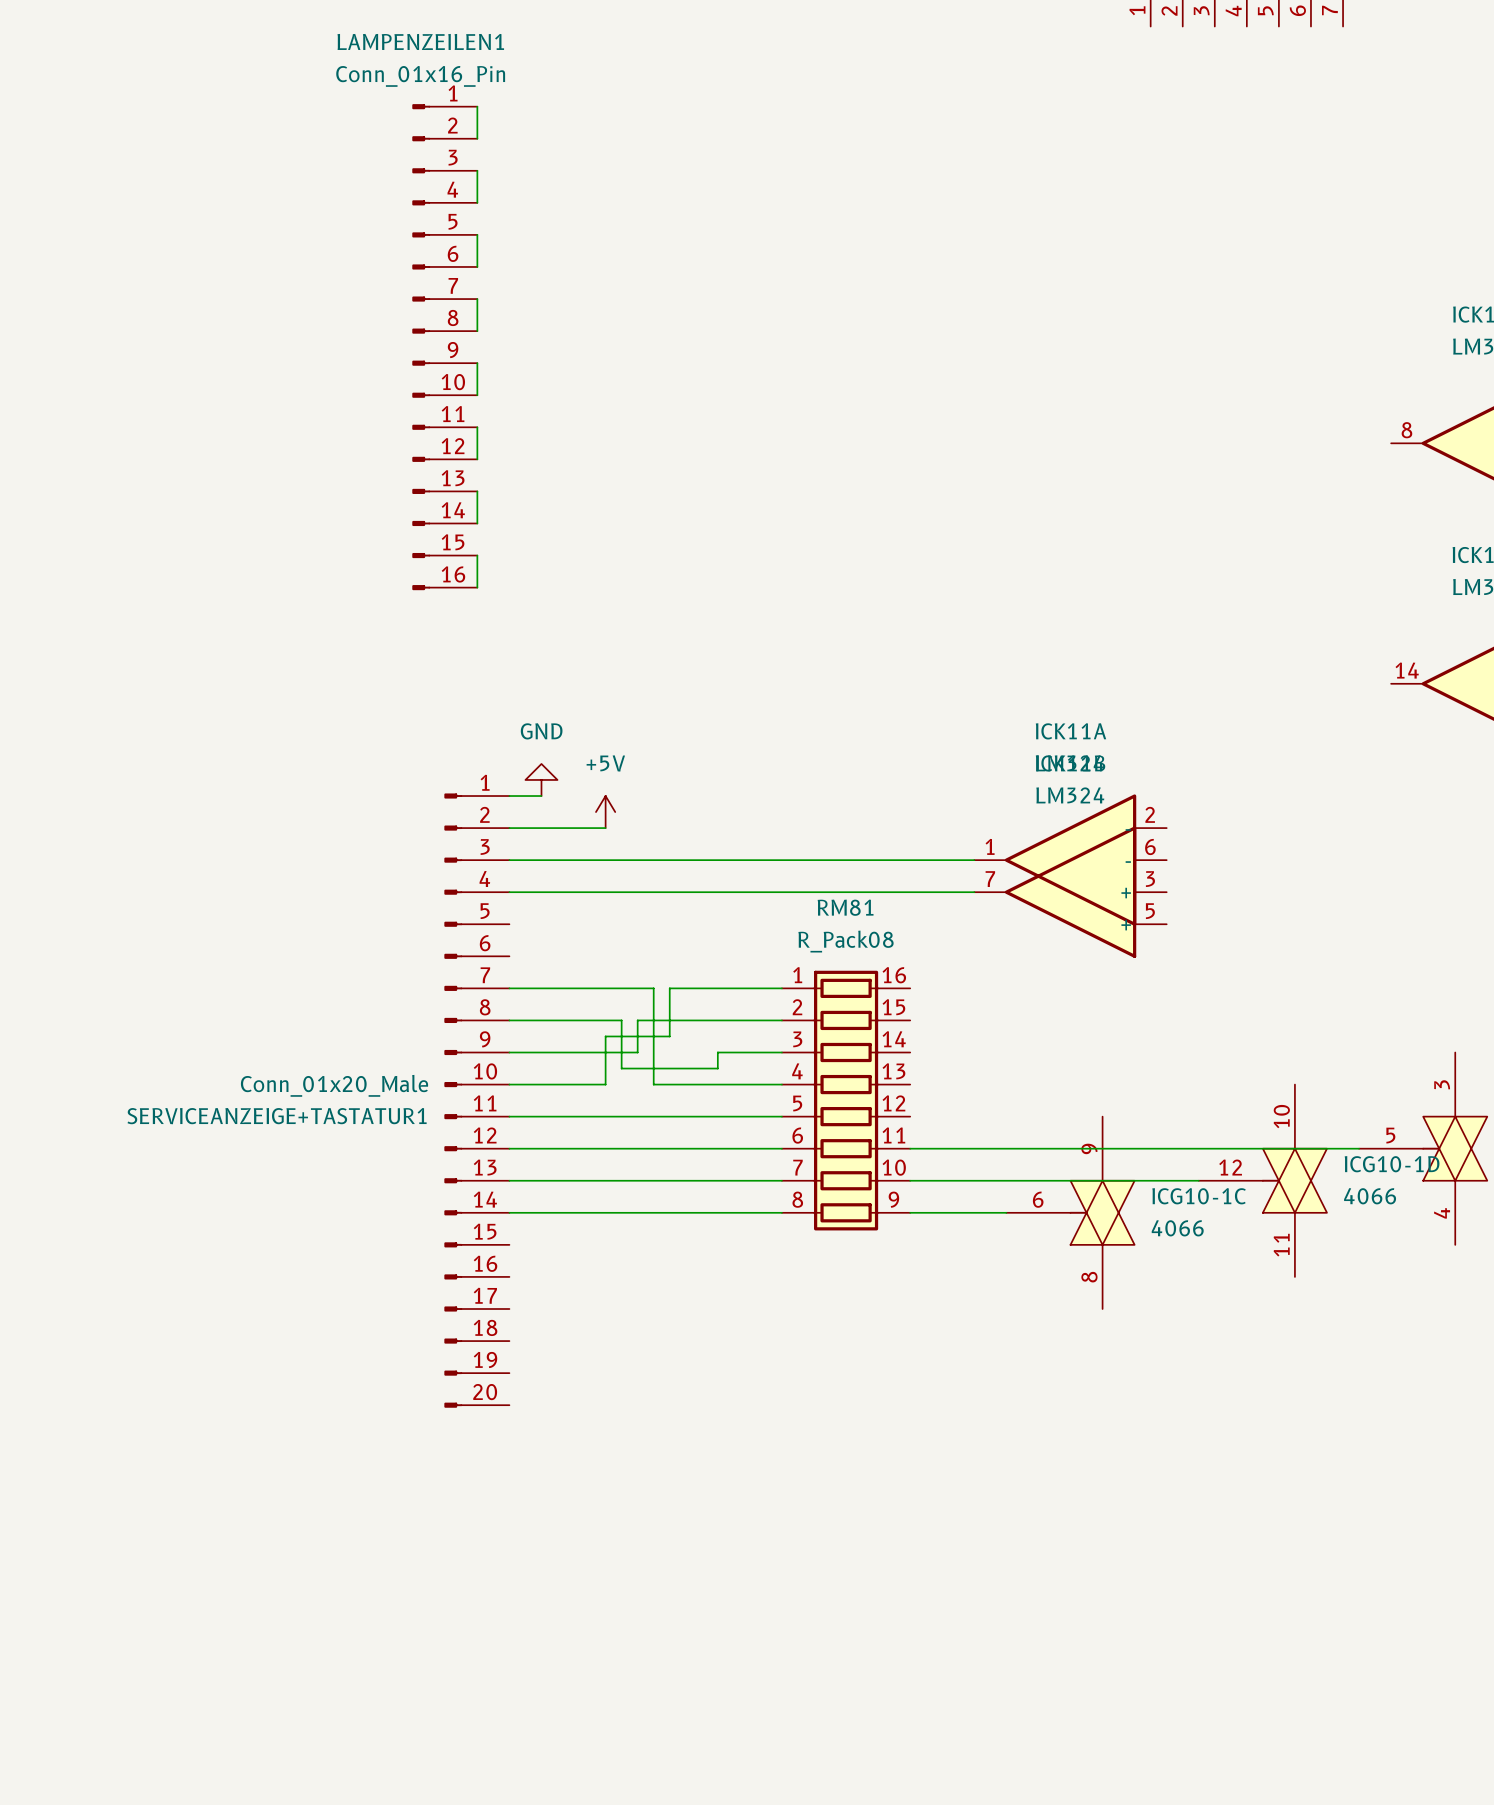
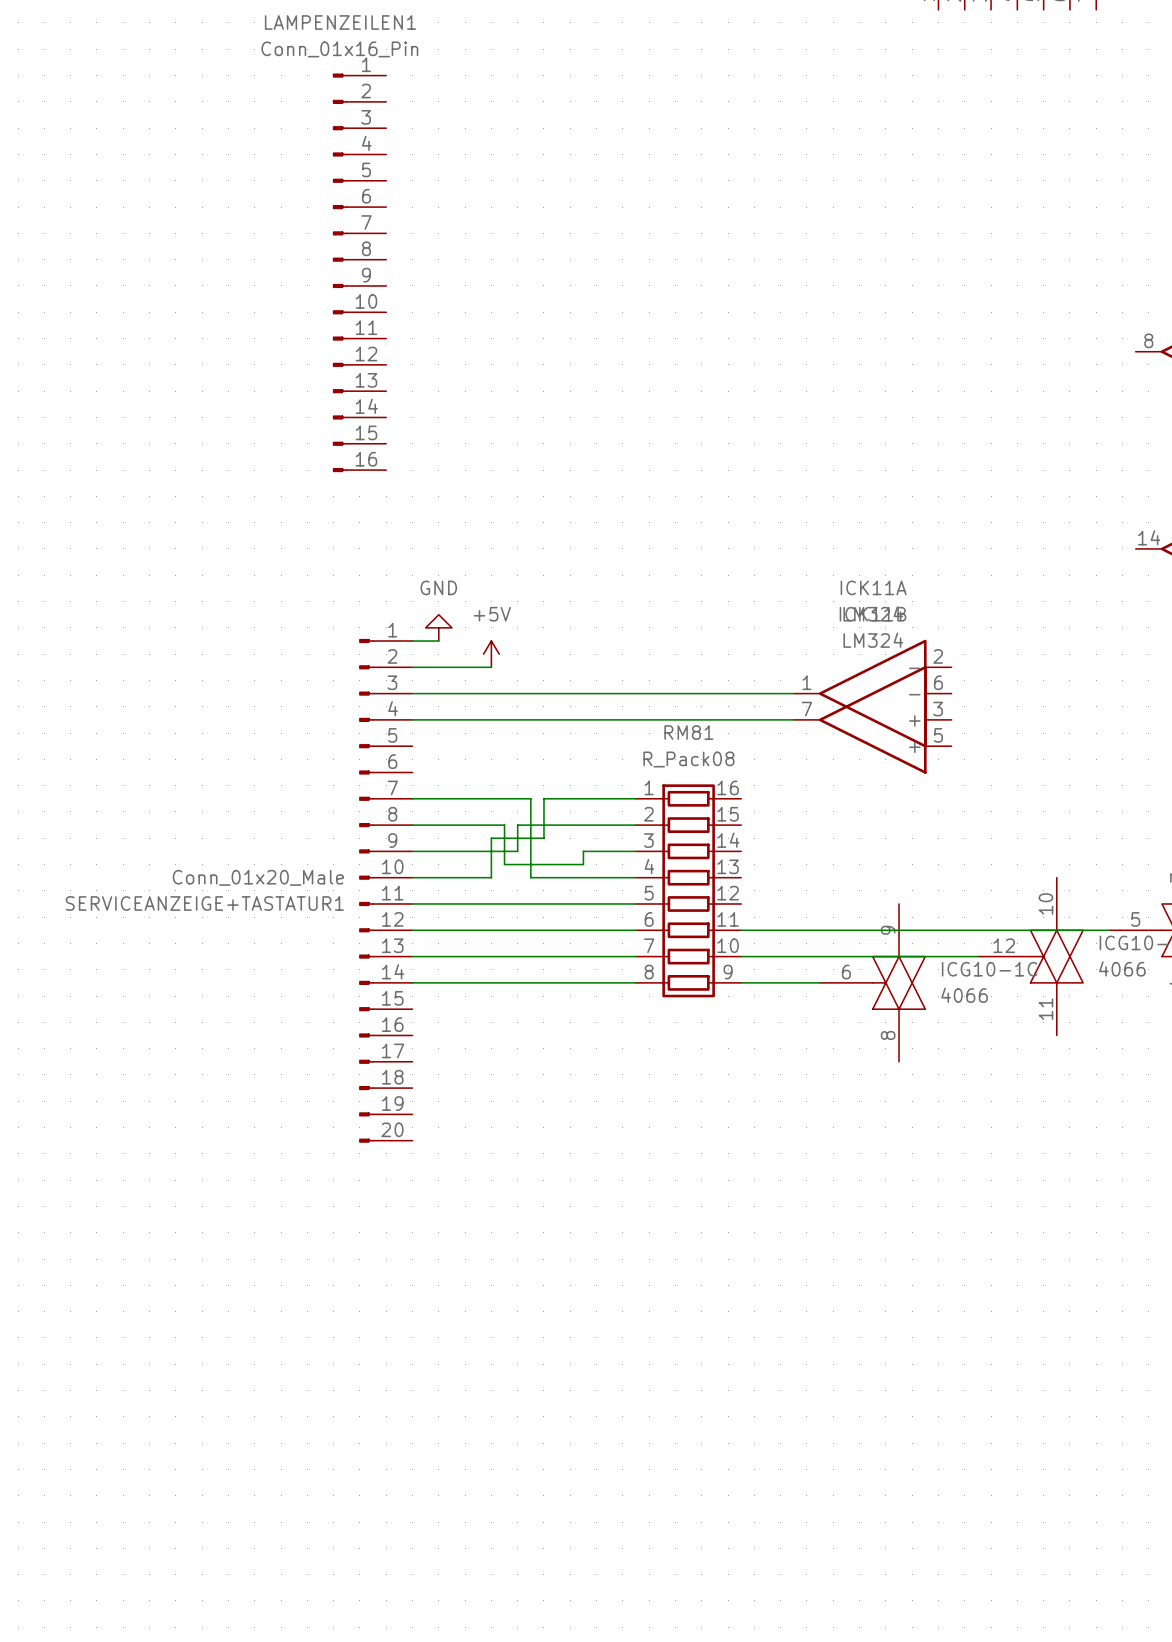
wire: (477, 106) (477, 138) -> none
wire: (477, 170) (477, 202) -> none
wire: (477, 234) (477, 266) -> none
wire: (477, 299) (477, 331) -> none
wire: (477, 363) (477, 395) -> none
wire: (477, 427) (477, 459) -> none
wire: (477, 491) (477, 523) -> none
wire: (477, 555) (477, 587) -> none

